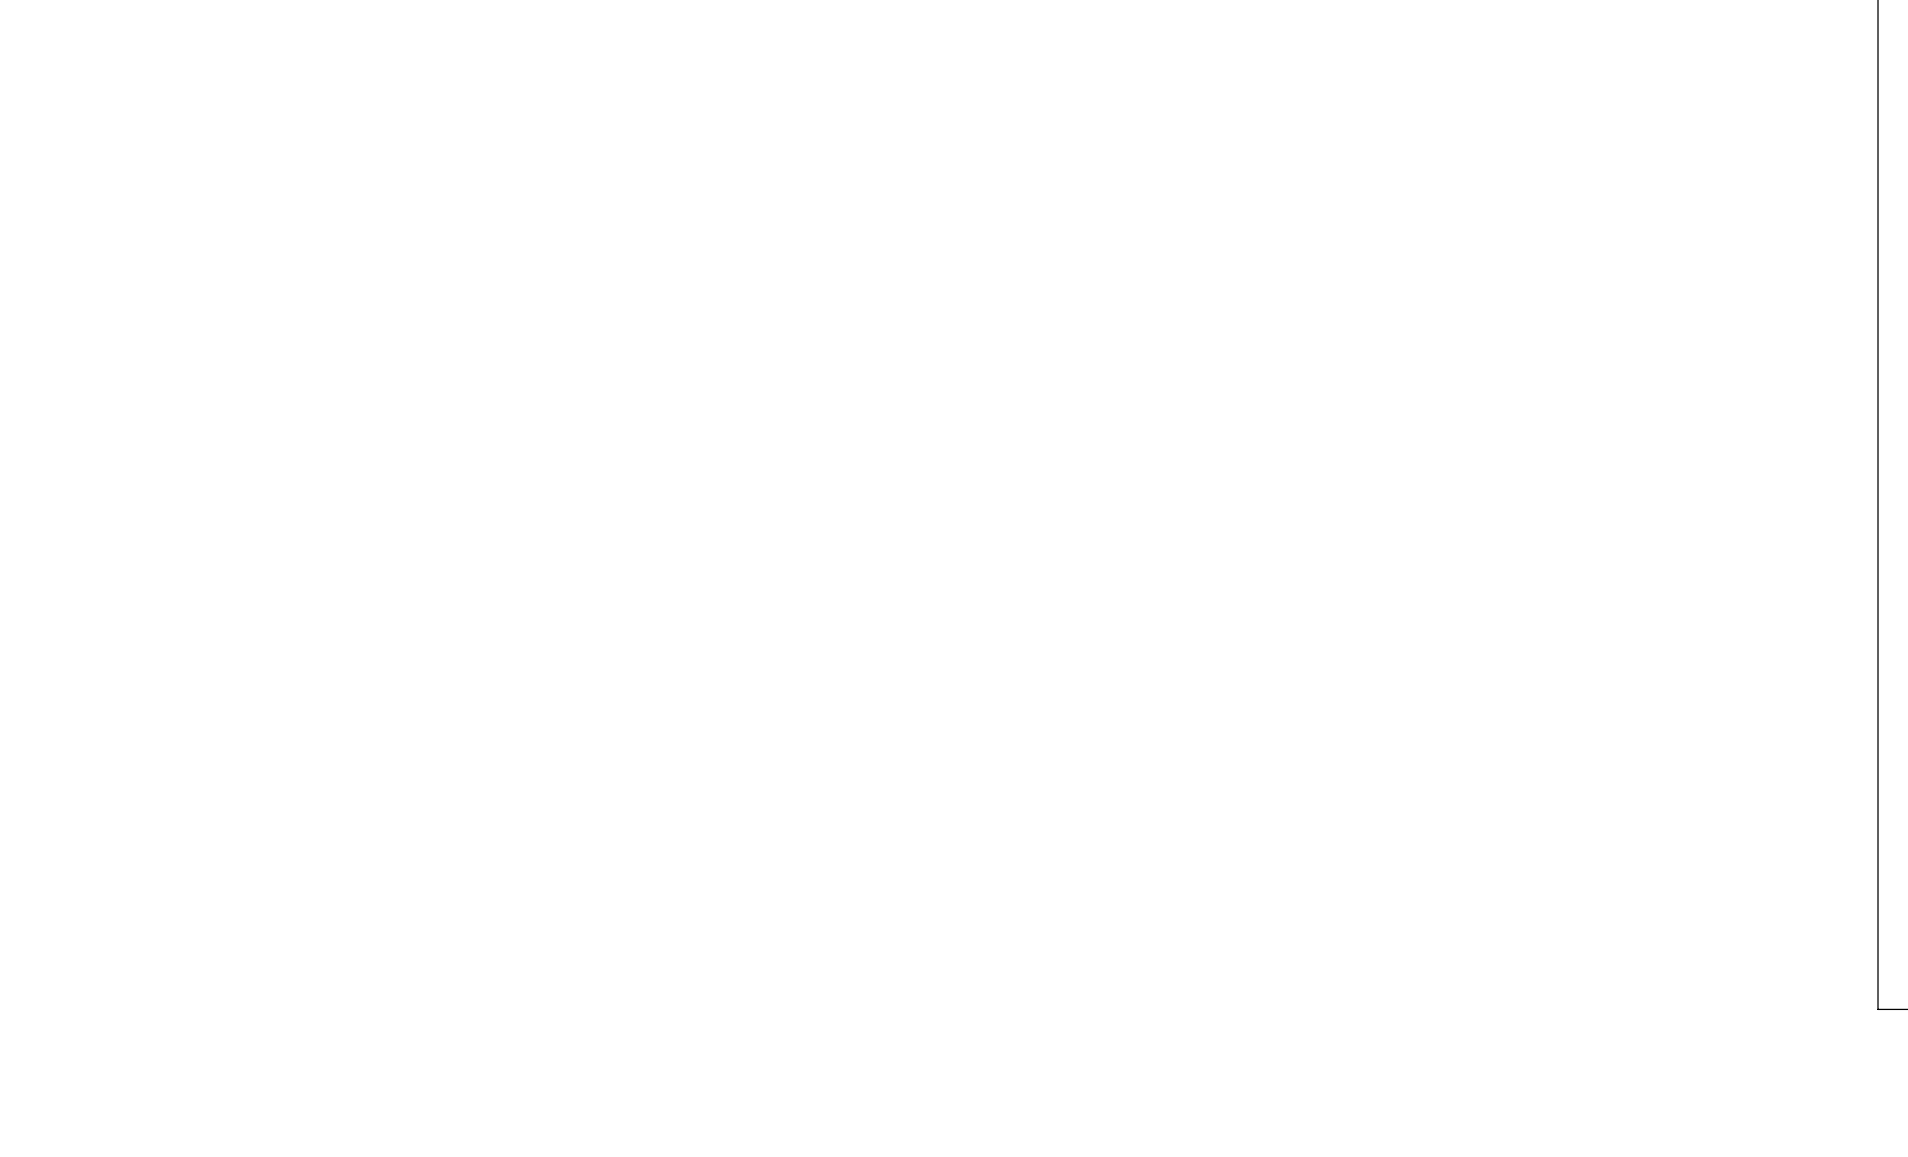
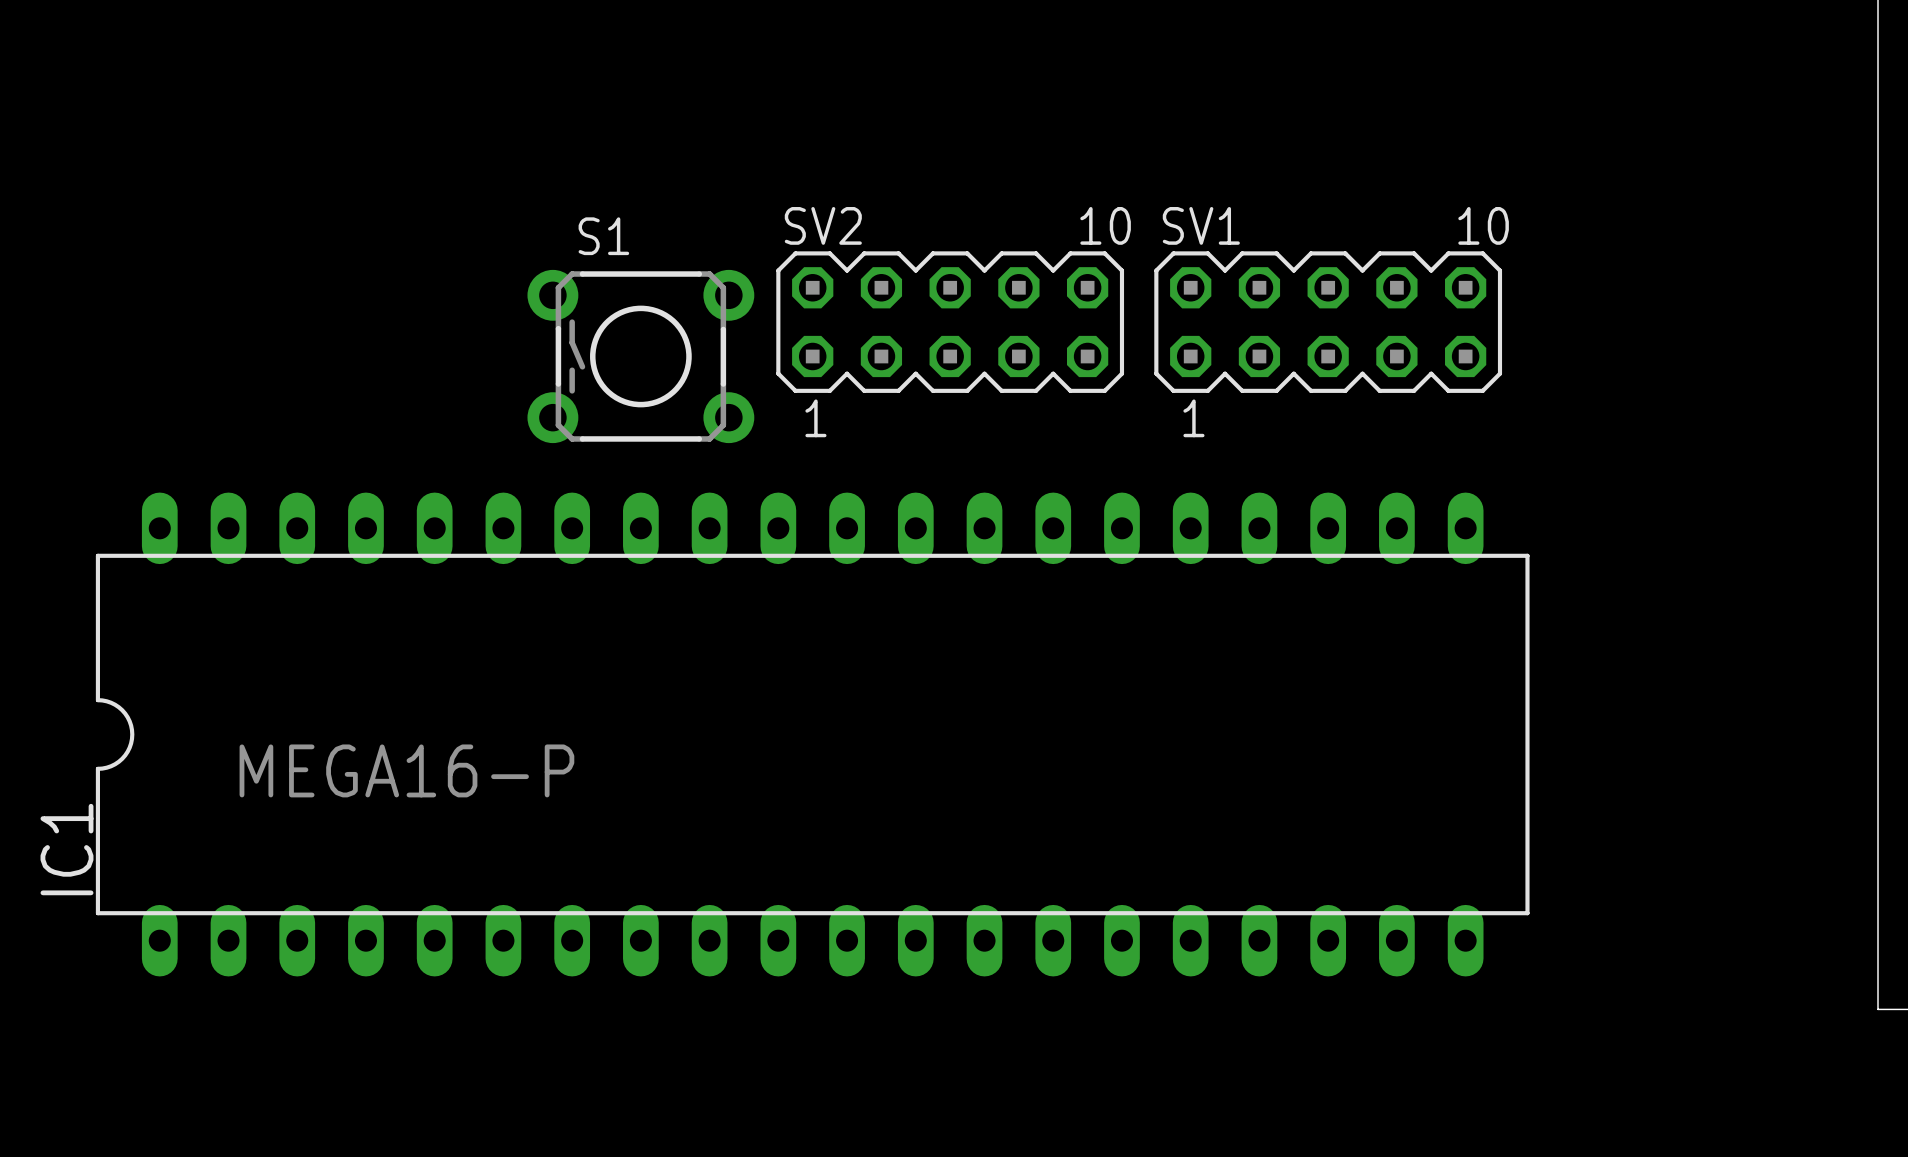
SV2: none -> (950, 322)
SV1: none -> (1328, 322)
S1: none -> (640, 356)
IC1: none -> MEGA16-P (812, 734)

